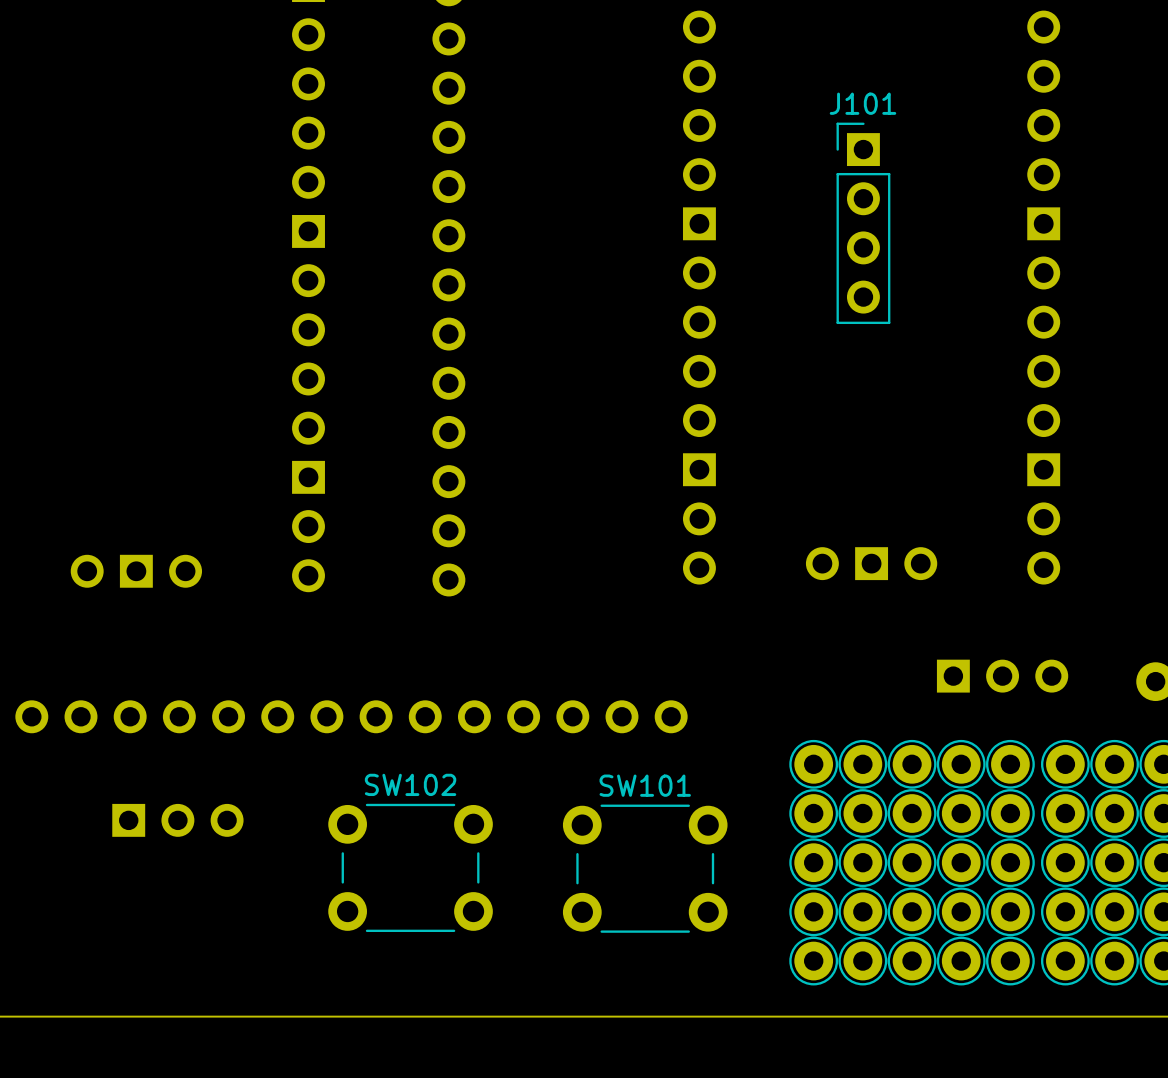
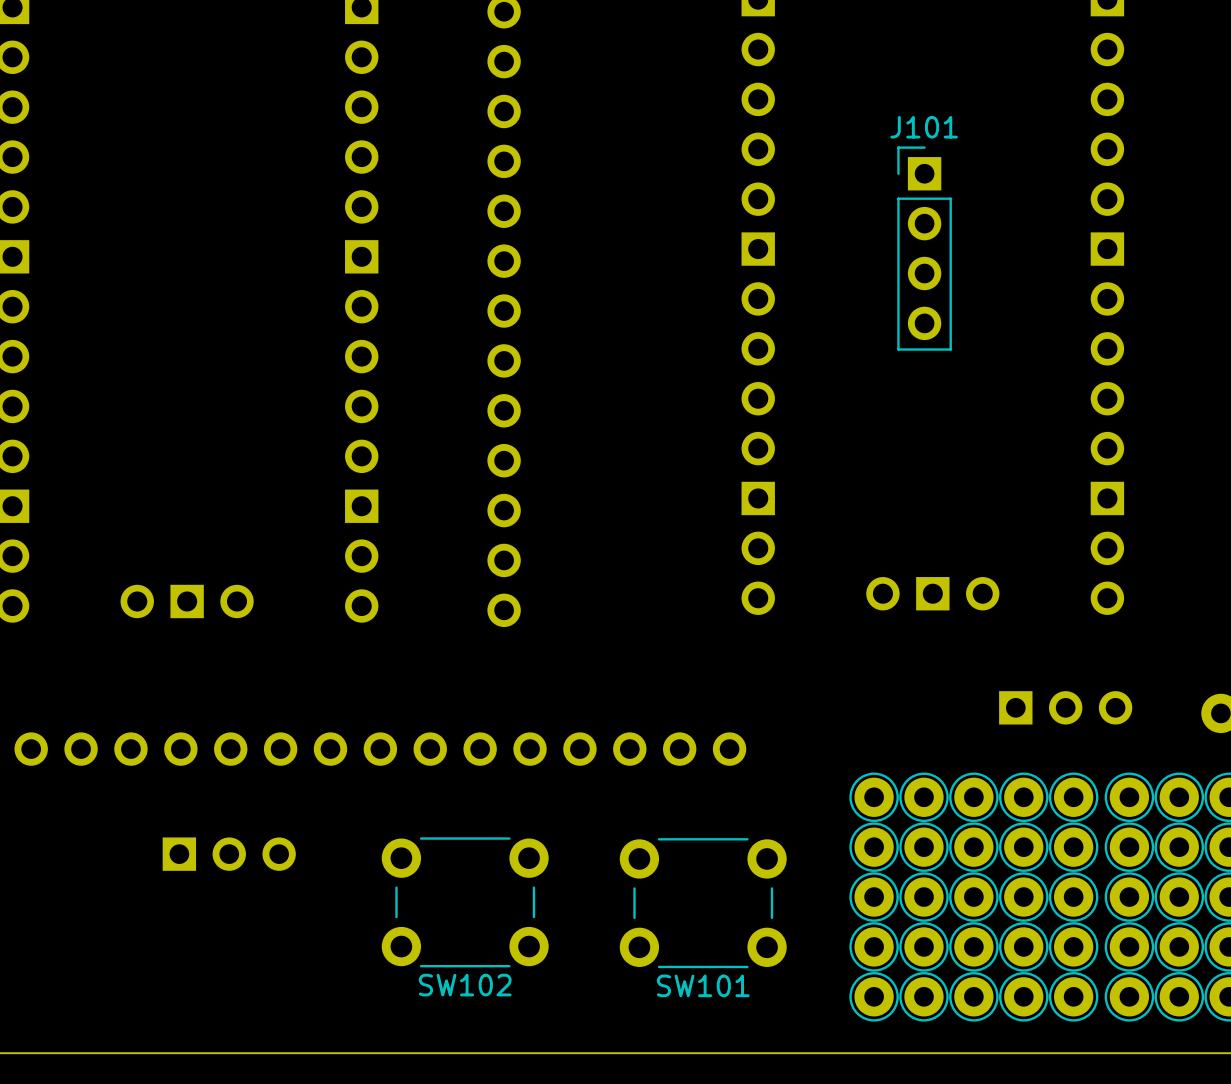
SW102 name position: SW102 (410, 784) -> SW102 (465, 985)
SW101 name position: SW101 (645, 785) -> SW101 (703, 985)

